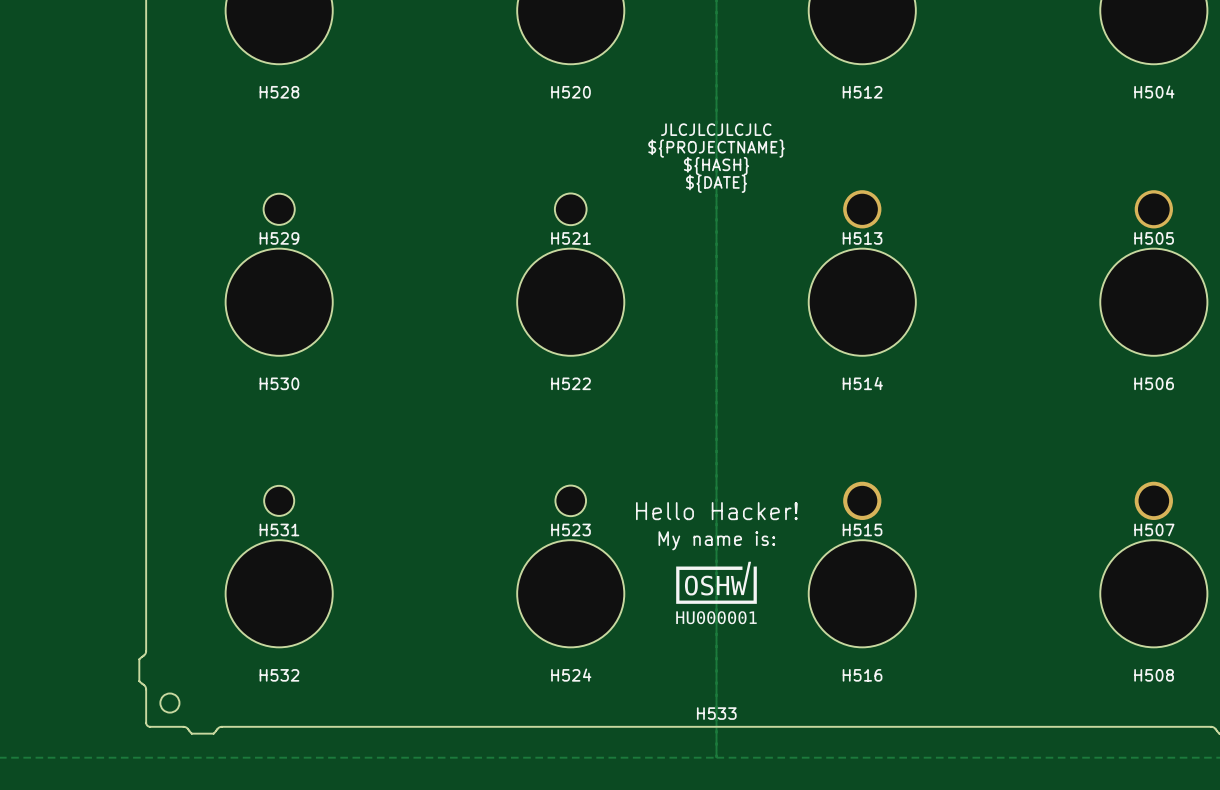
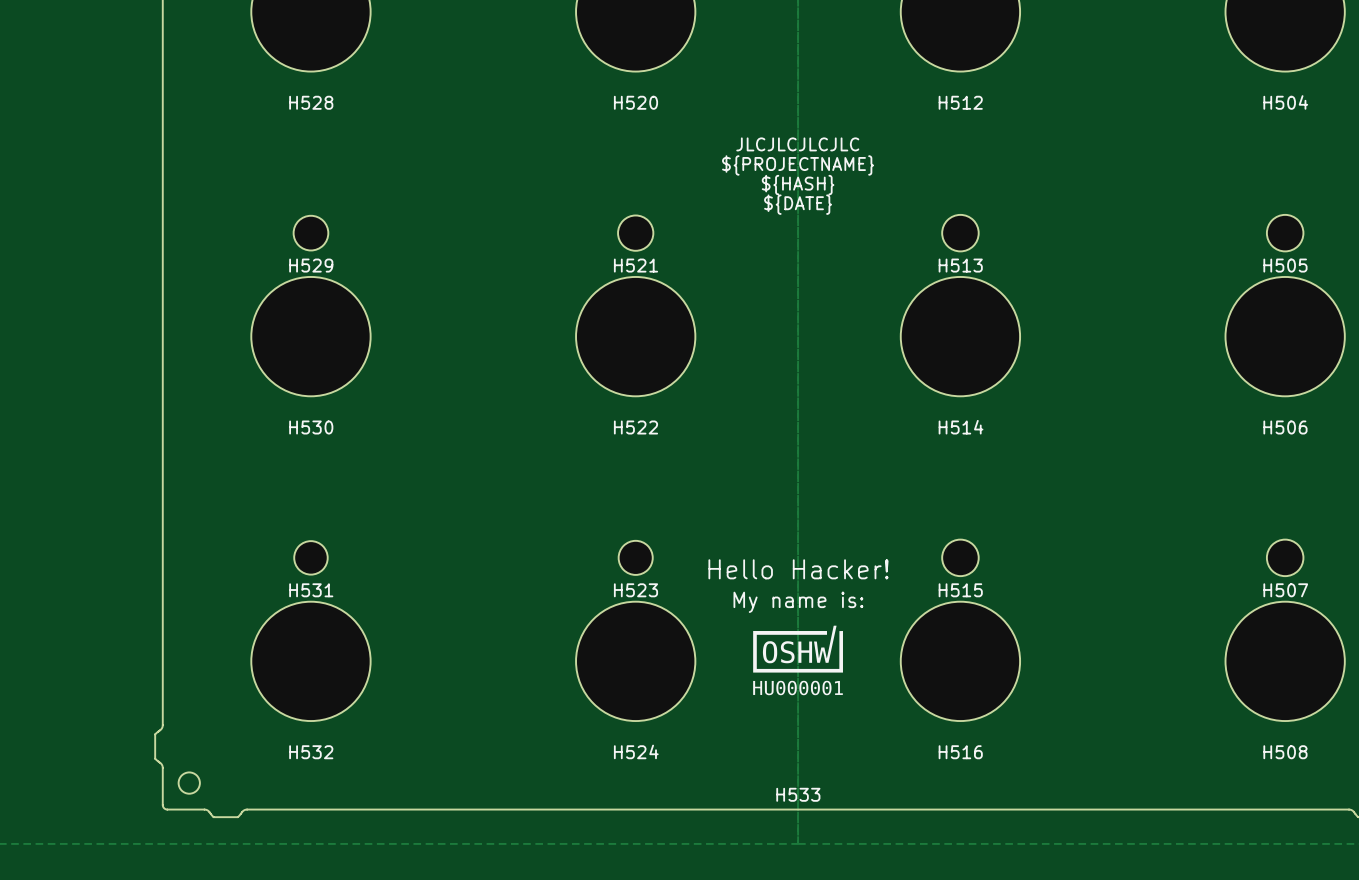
H513 footprint: [843, 190, 882, 229] -> [942, 214, 979, 252]
H505 footprint: [1134, 190, 1173, 229] -> [1266, 214, 1304, 252]
H515 footprint: [843, 481, 882, 520] -> [942, 539, 979, 577]
H507 footprint: [1134, 481, 1173, 520] -> [1266, 539, 1304, 577]

